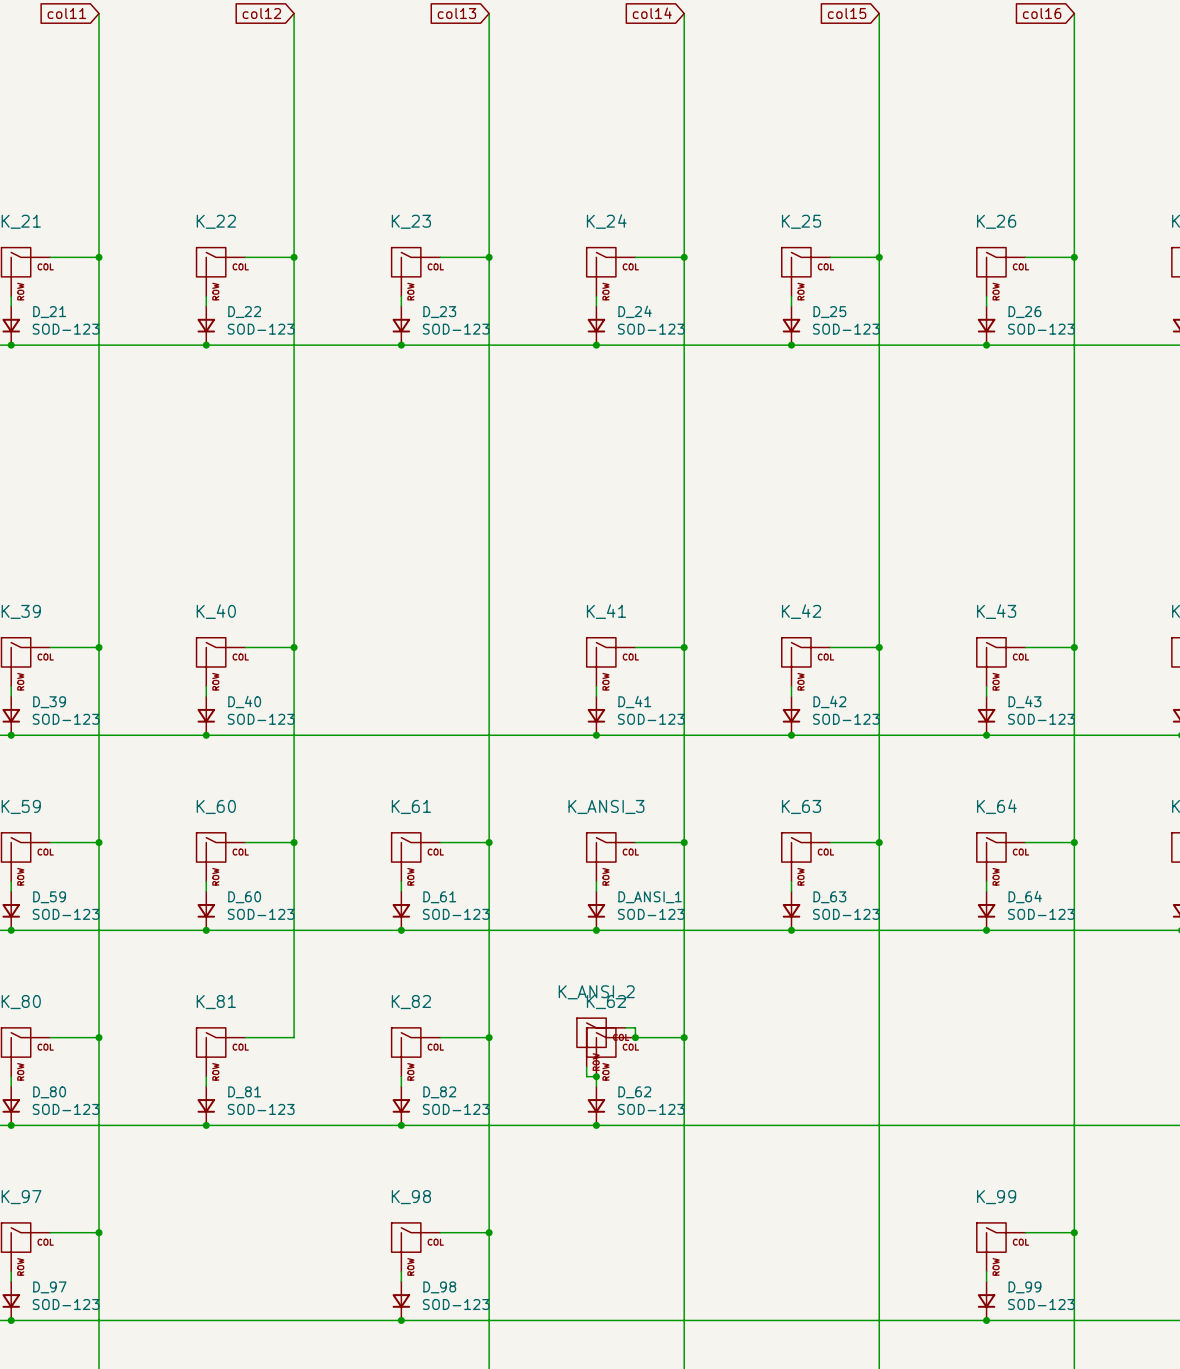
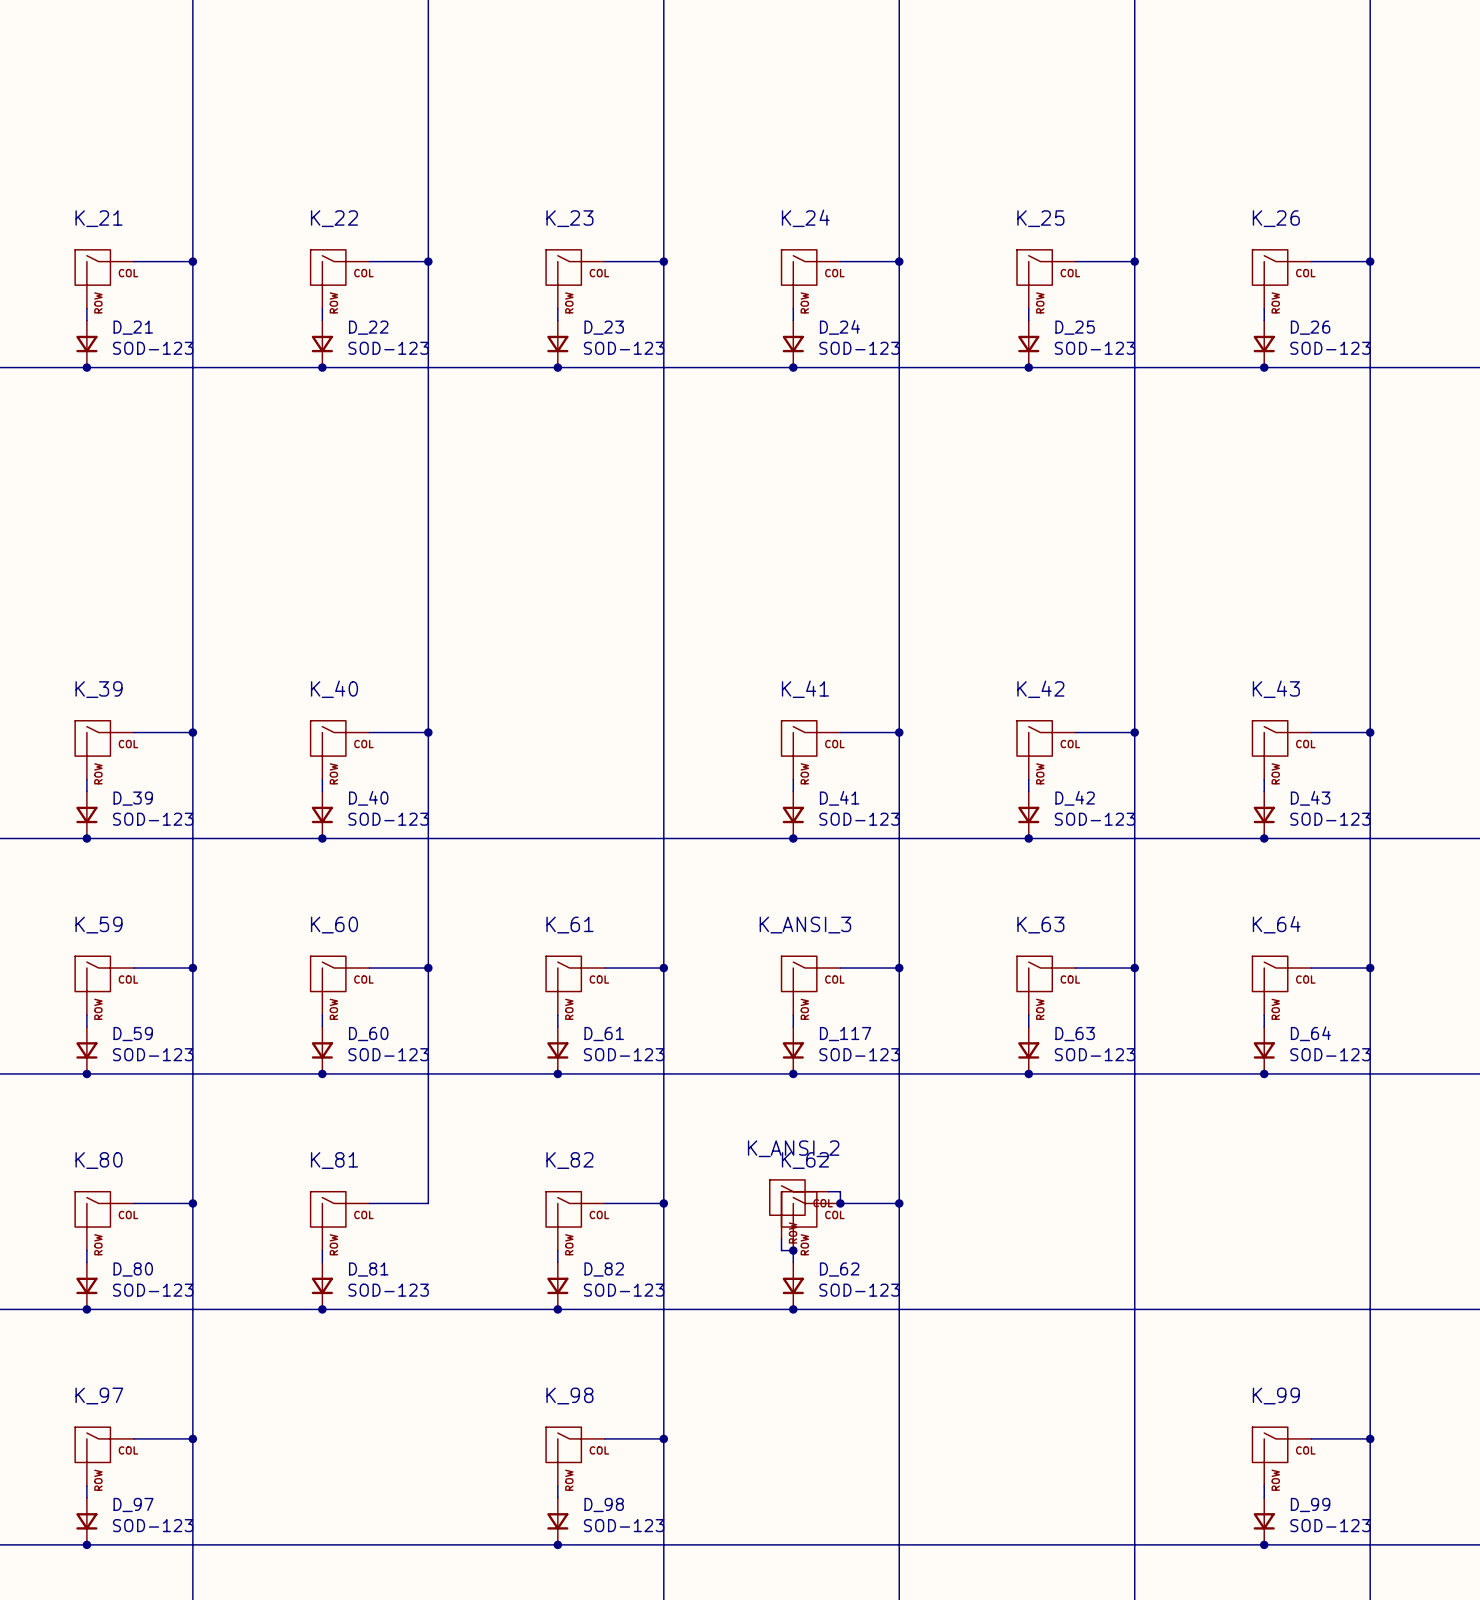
D_ANSI_1 name: D_ANSI_1 (650, 897) -> D_117 (845, 1034)

